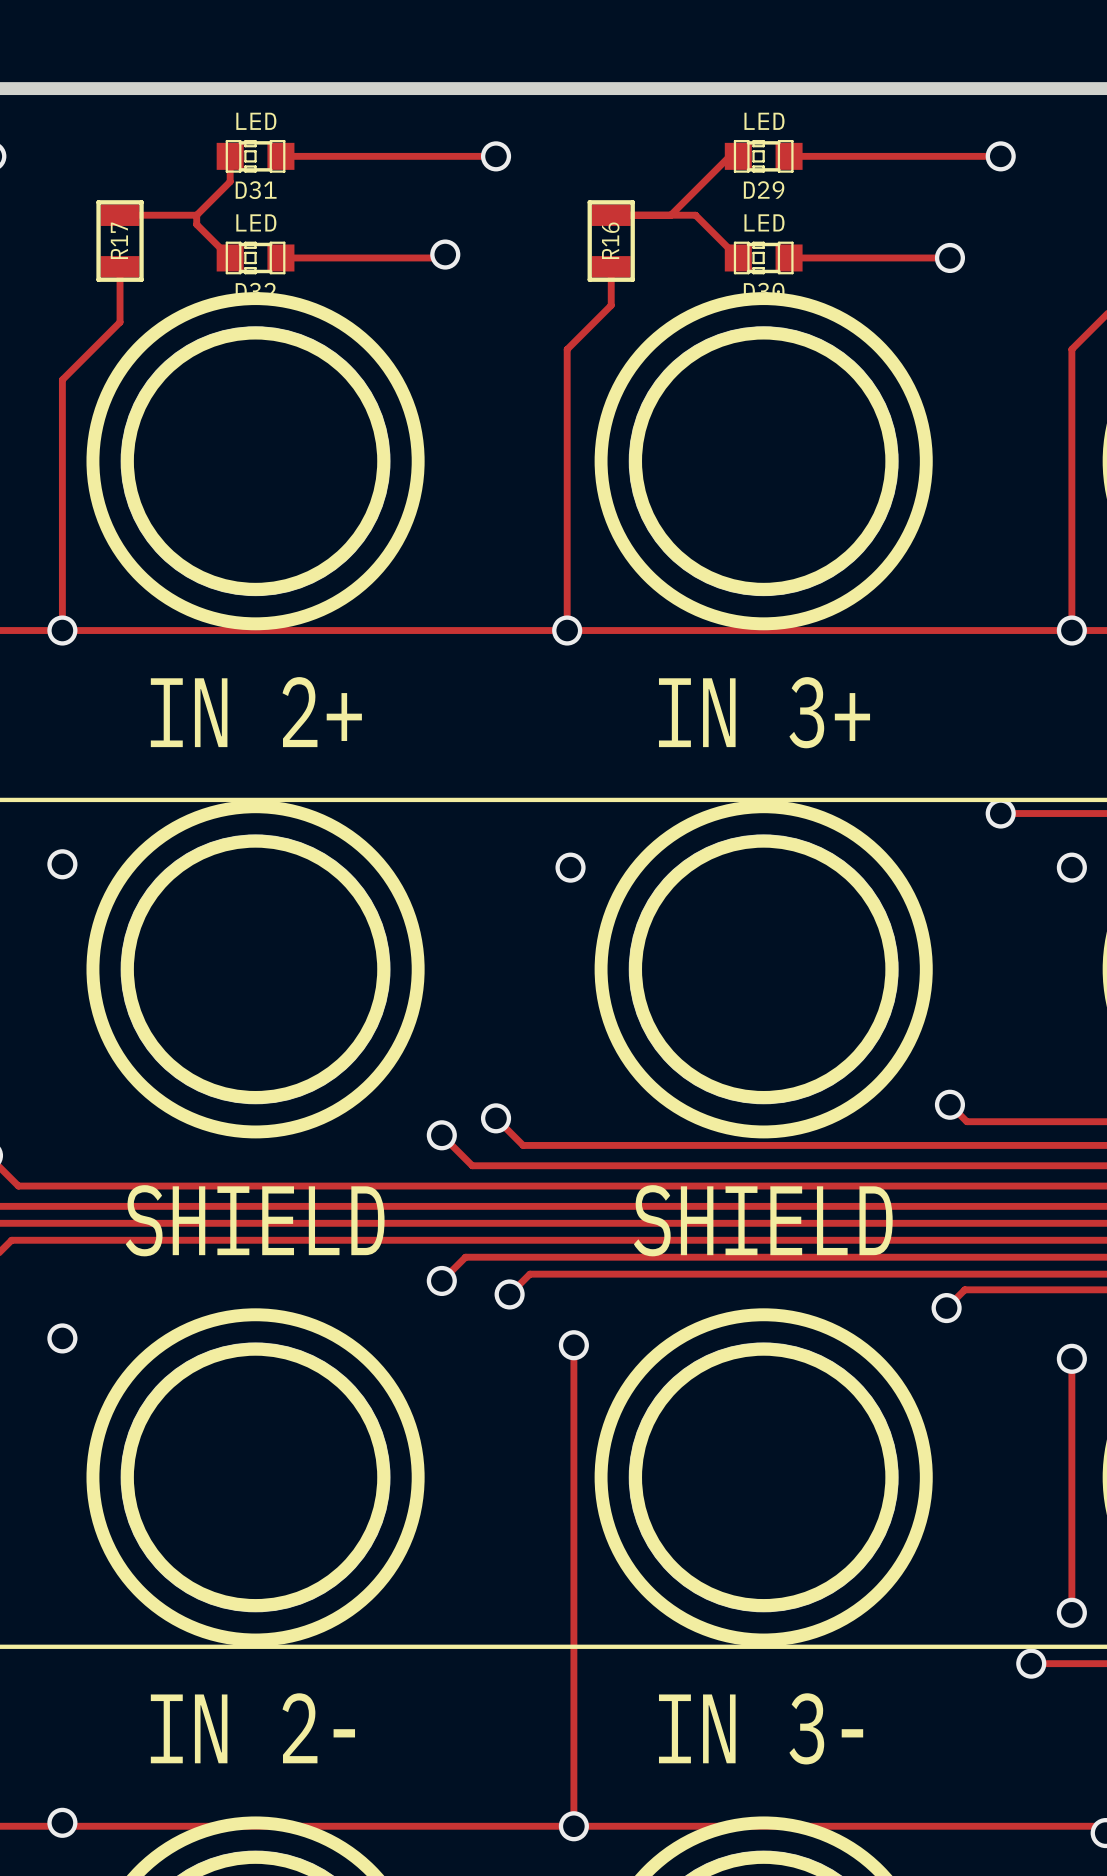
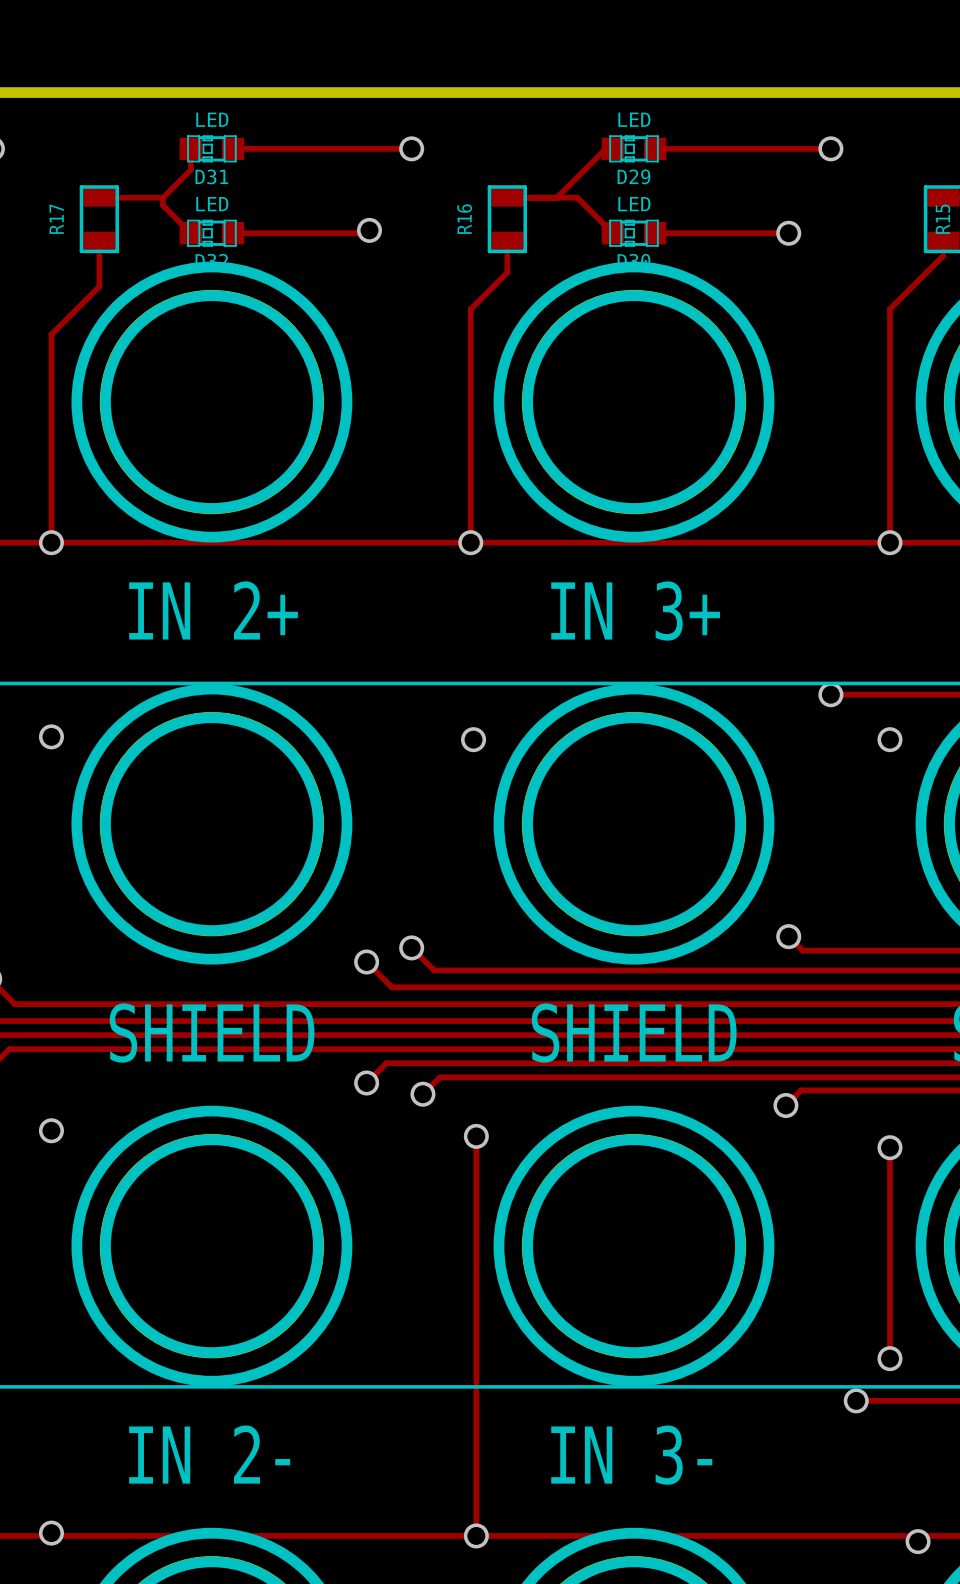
R17 name position: R17 (119, 240) -> R17 (56, 219)
R16 name position: R16 (610, 240) -> R16 (464, 219)

